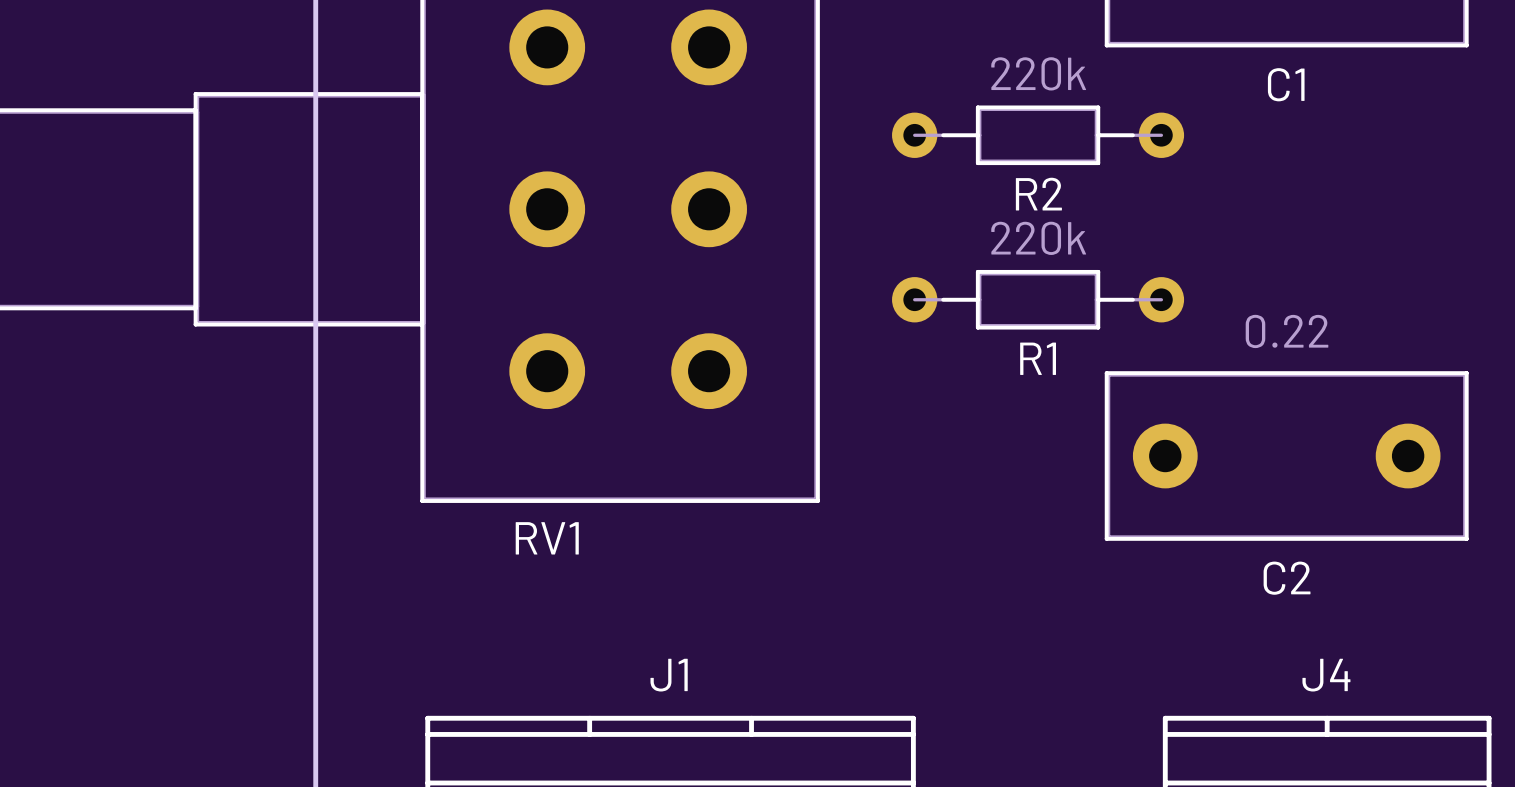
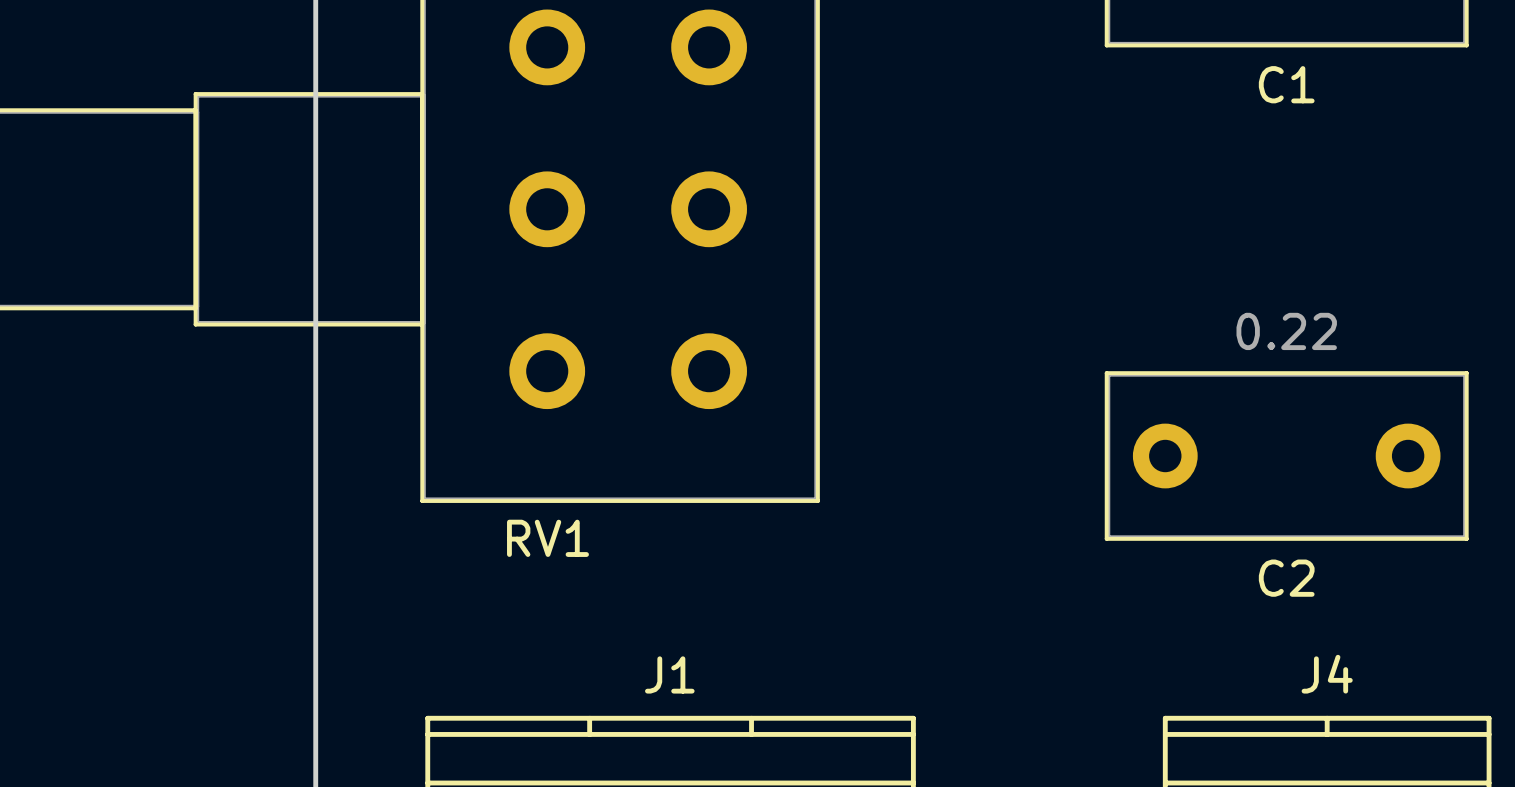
R2: 220k (1038, 135) -> none
R1: 220k (1038, 299) -> none

